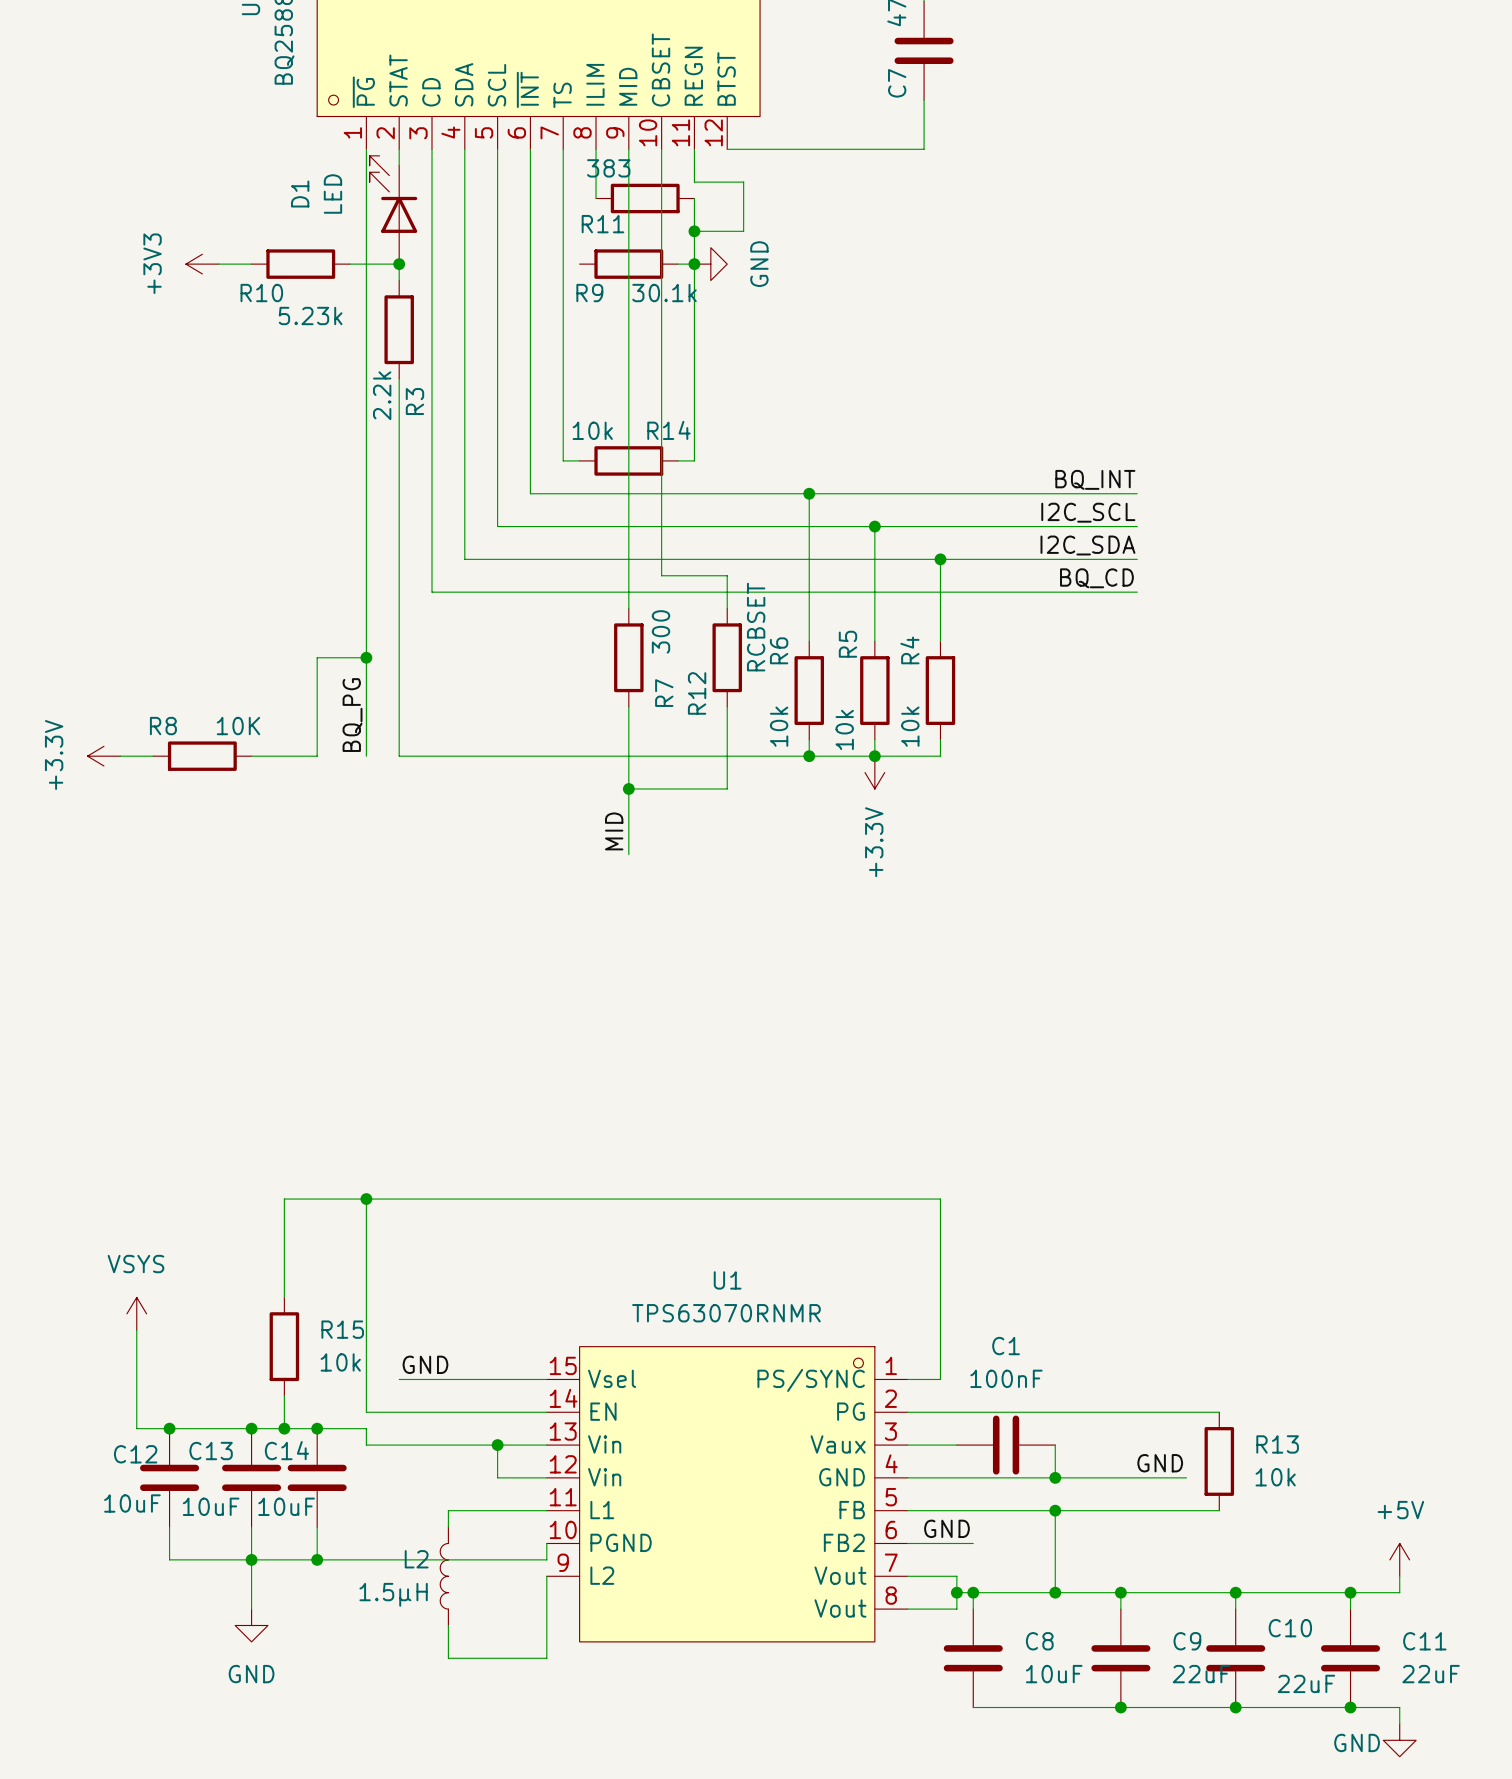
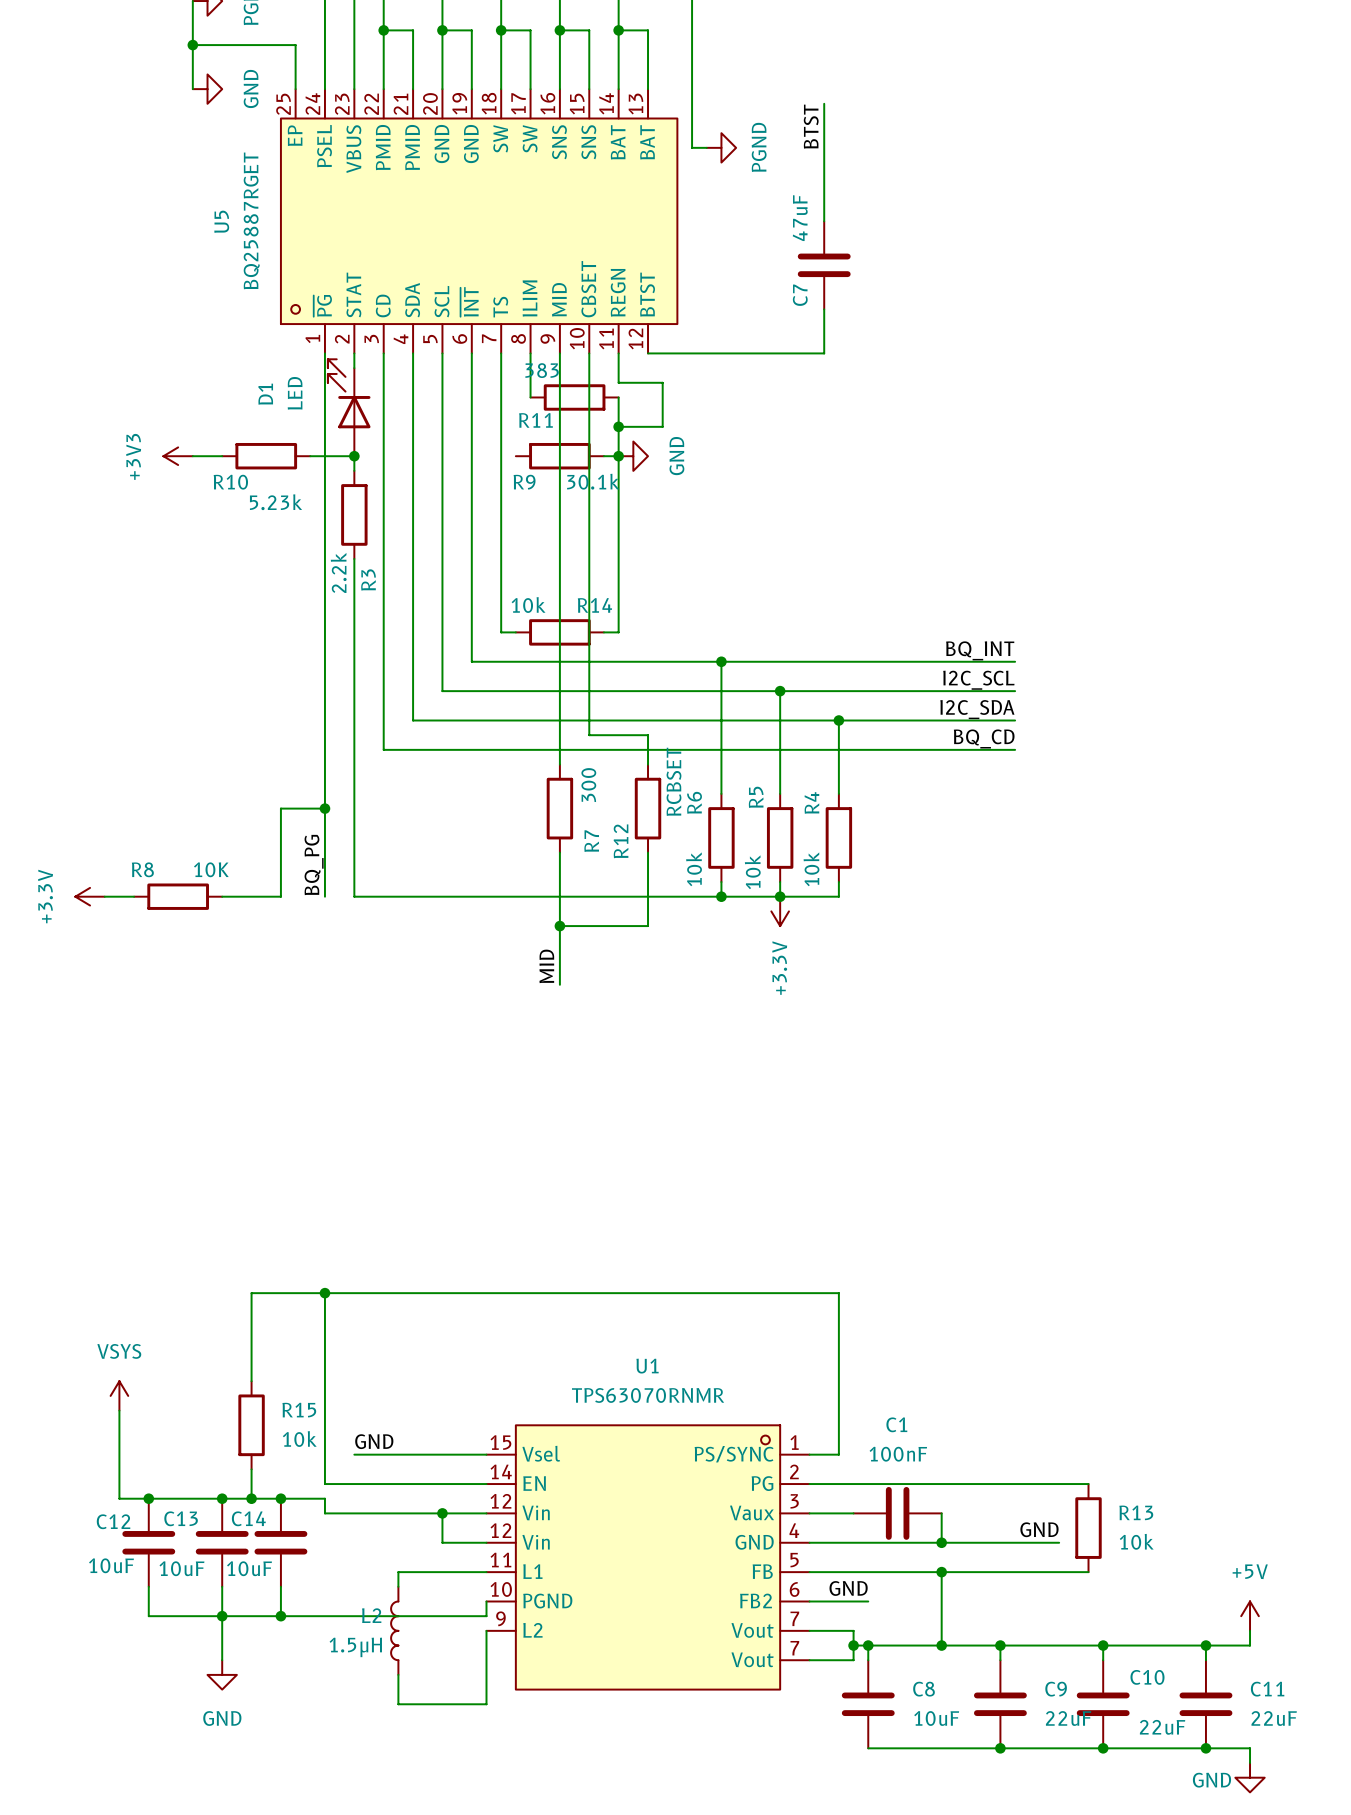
U1 pin number: 13 (563, 1431) -> 12 (500, 1501)
U1 pin number: 8 (891, 1595) -> 7 (794, 1648)

